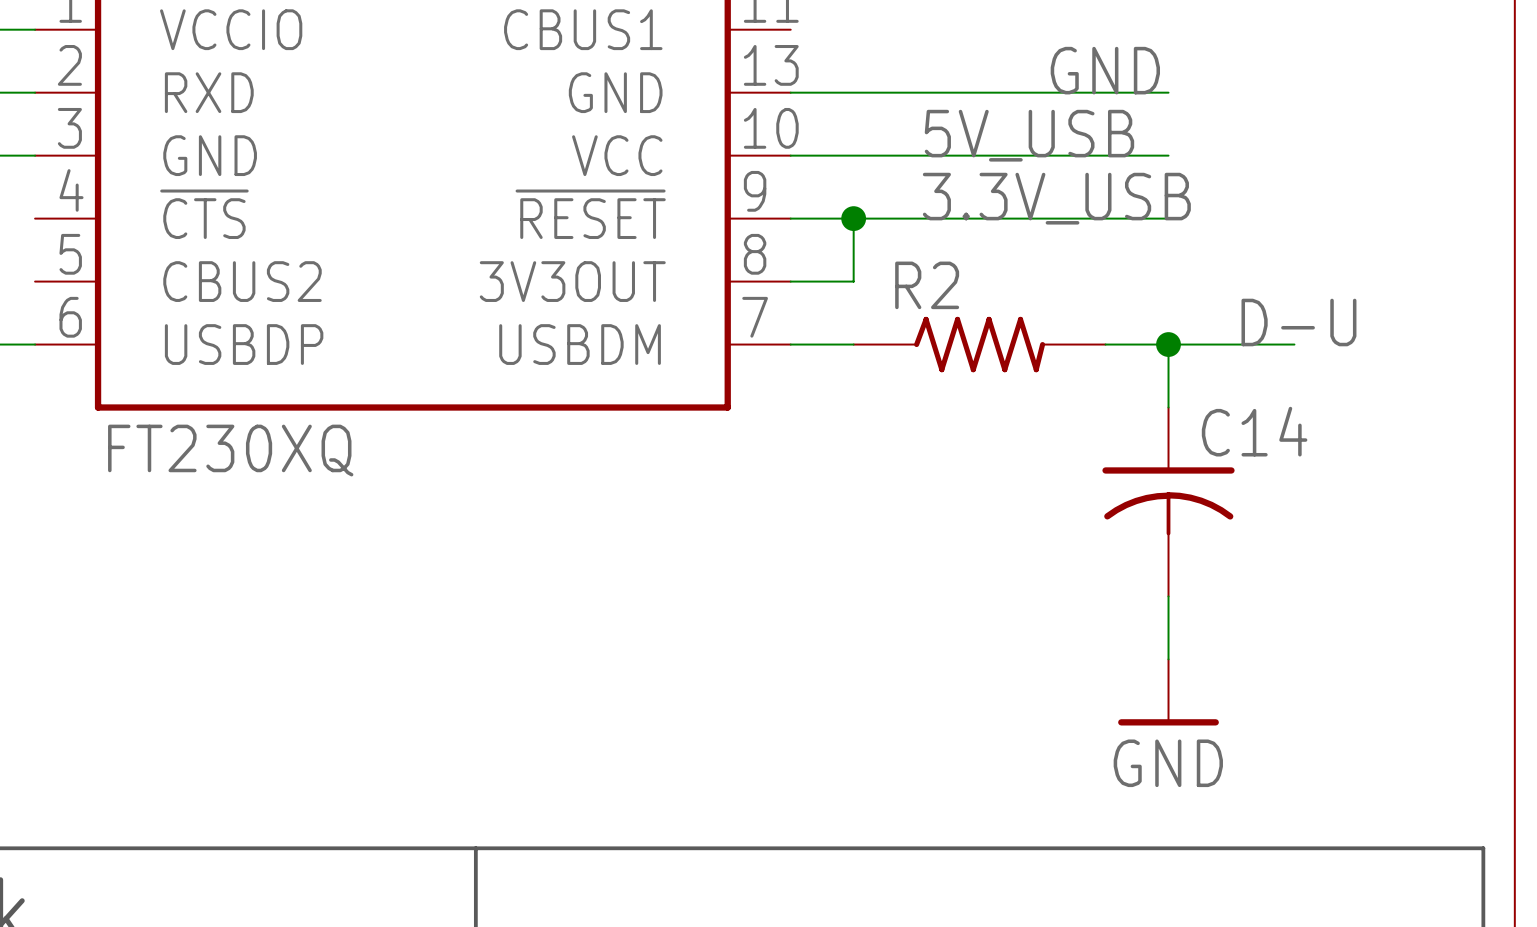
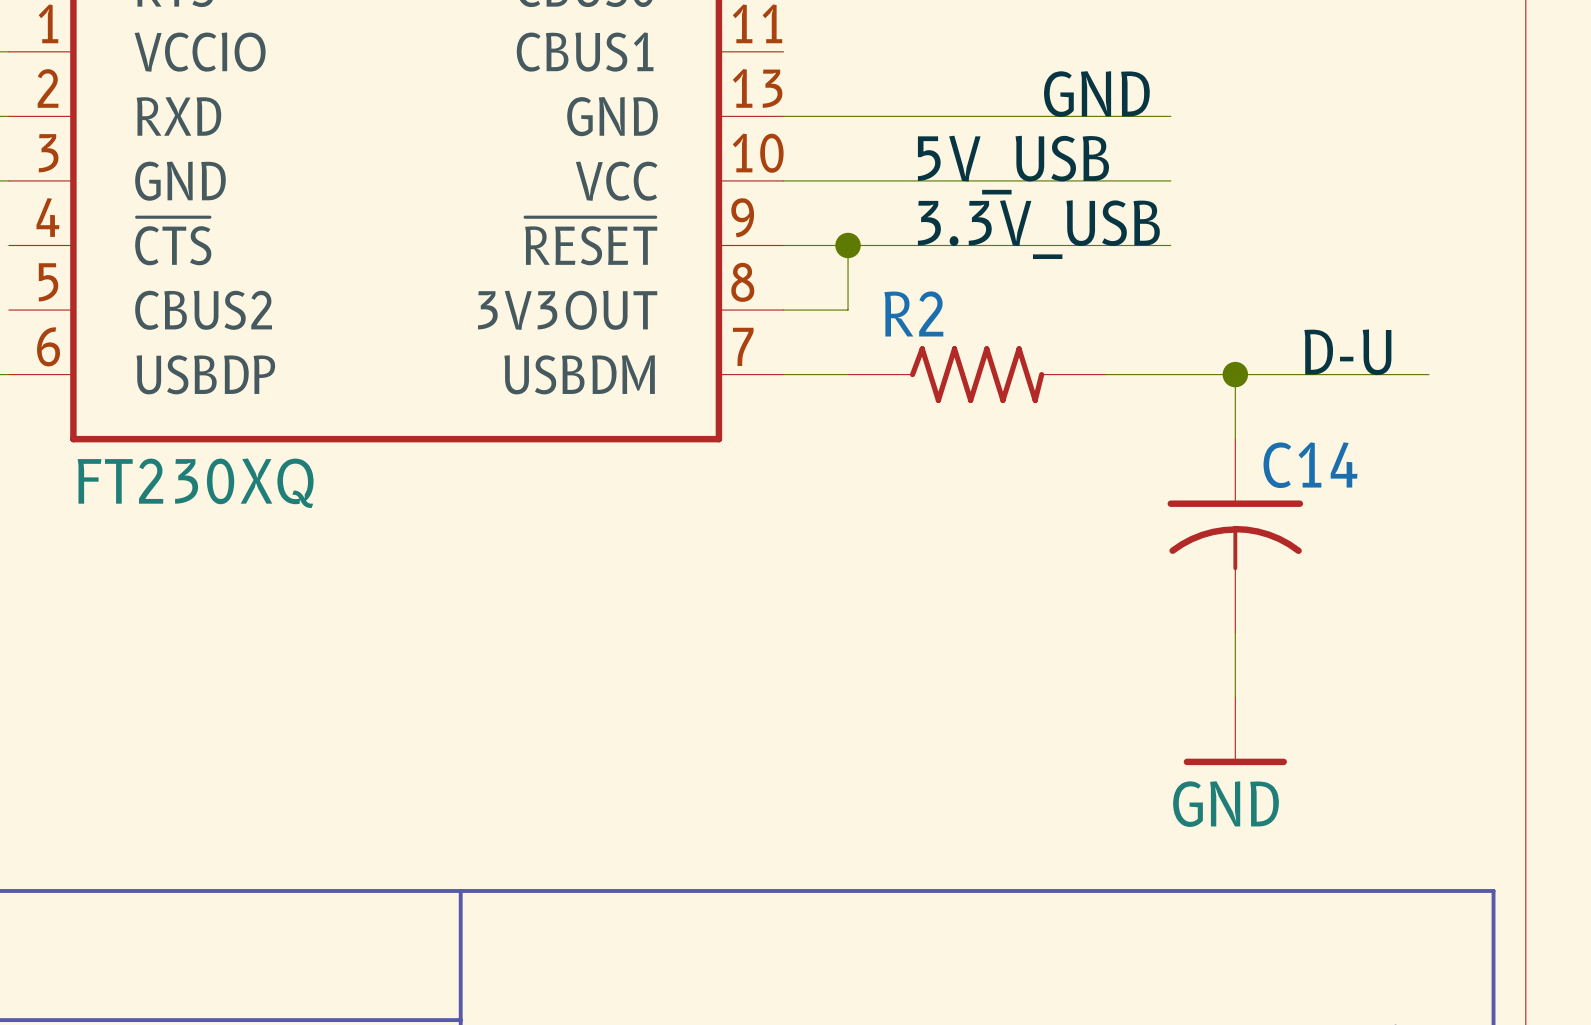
label position: D-U (1298, 322) -> D-U (1347, 352)
wire: (1168, 344) (1168, 407) -> (1235, 374) (1235, 439)
junction position: (1168, 344) -> (1235, 374)
wire: none -> (1299, 374) (1428, 374)
C14 position: (1168, 501) -> (1235, 535)
wire: (1168, 596) (1168, 659) -> (1235, 632) (1235, 697)
power symbol position: GND (1168, 692) -> GND (1235, 731)

